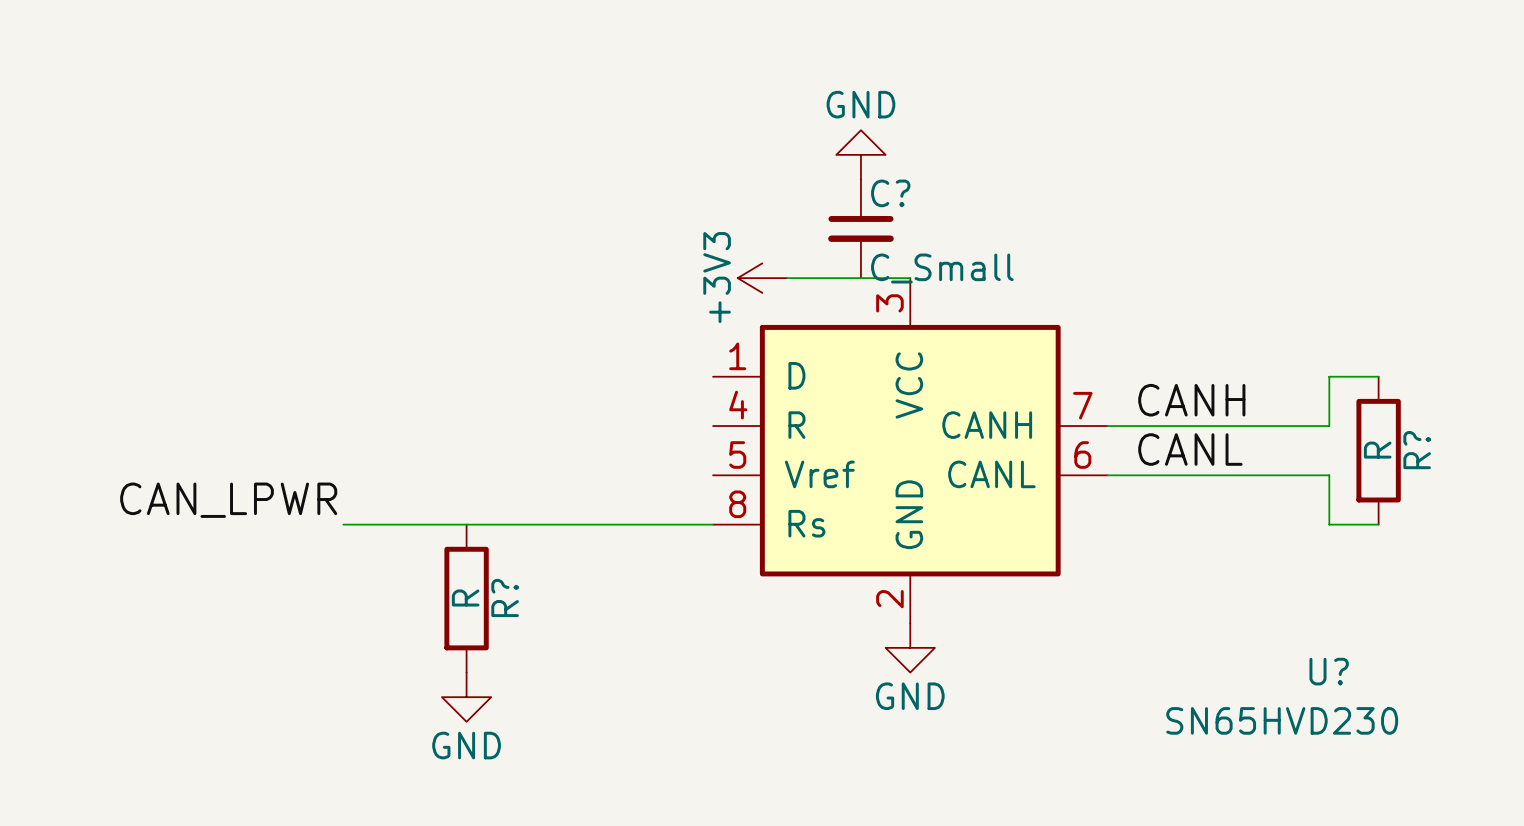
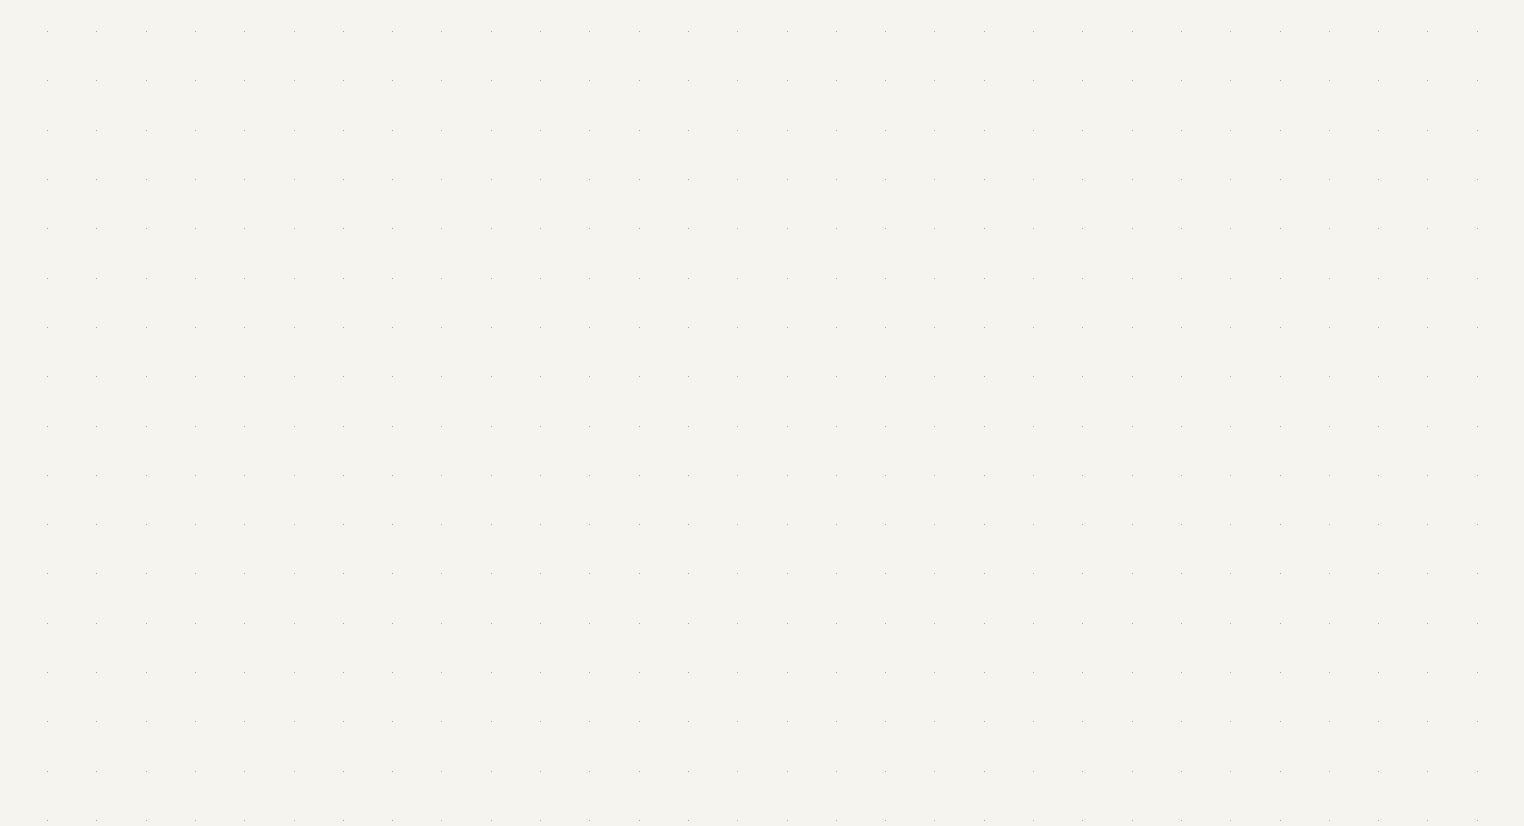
power symbol: GND (860, 154) -> none
C?: C_Small (860, 228) -> none
power symbol: +3V3 (762, 278) -> none
wire: (787, 278) (910, 278) -> none
wire: (1378, 376) (1329, 376) (1329, 426) (1107, 426) -> none
label: CANH (1191, 400) -> none
label: CANL (1190, 449) -> none
U?: SN65HVD230 (910, 450) -> none
R?: R (1378, 450) -> none
wire: (1107, 475) (1329, 475) (1329, 524) (1378, 524) -> none
label: CAN_LPWR (228, 500) -> none
wire: (343, 524) (713, 524) -> none
R?: R (466, 598) -> none
power symbol: GND (910, 647) -> none
power symbol: GND (466, 697) -> none

